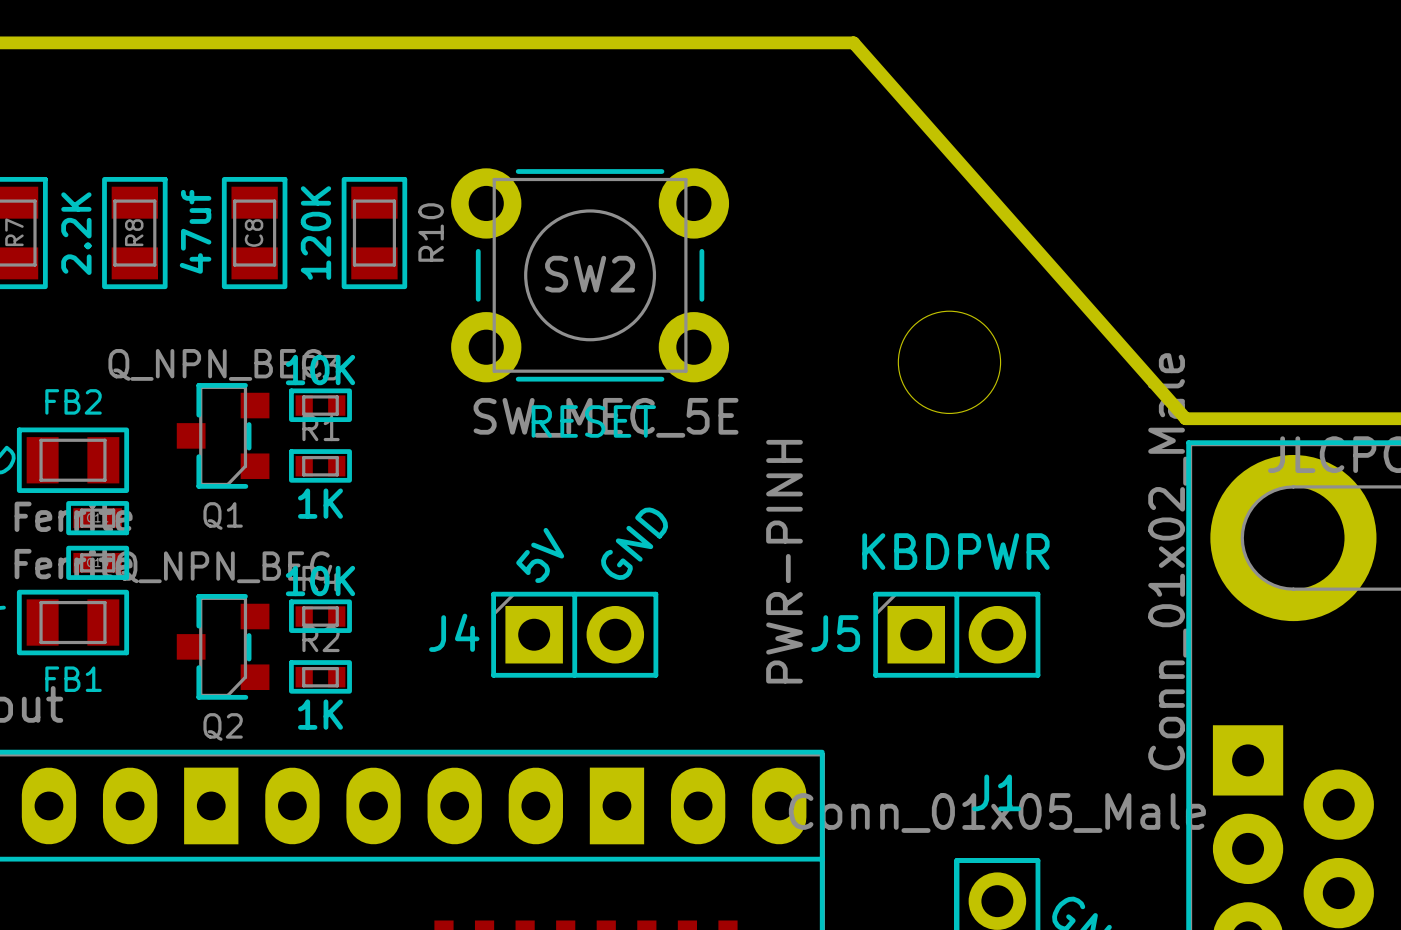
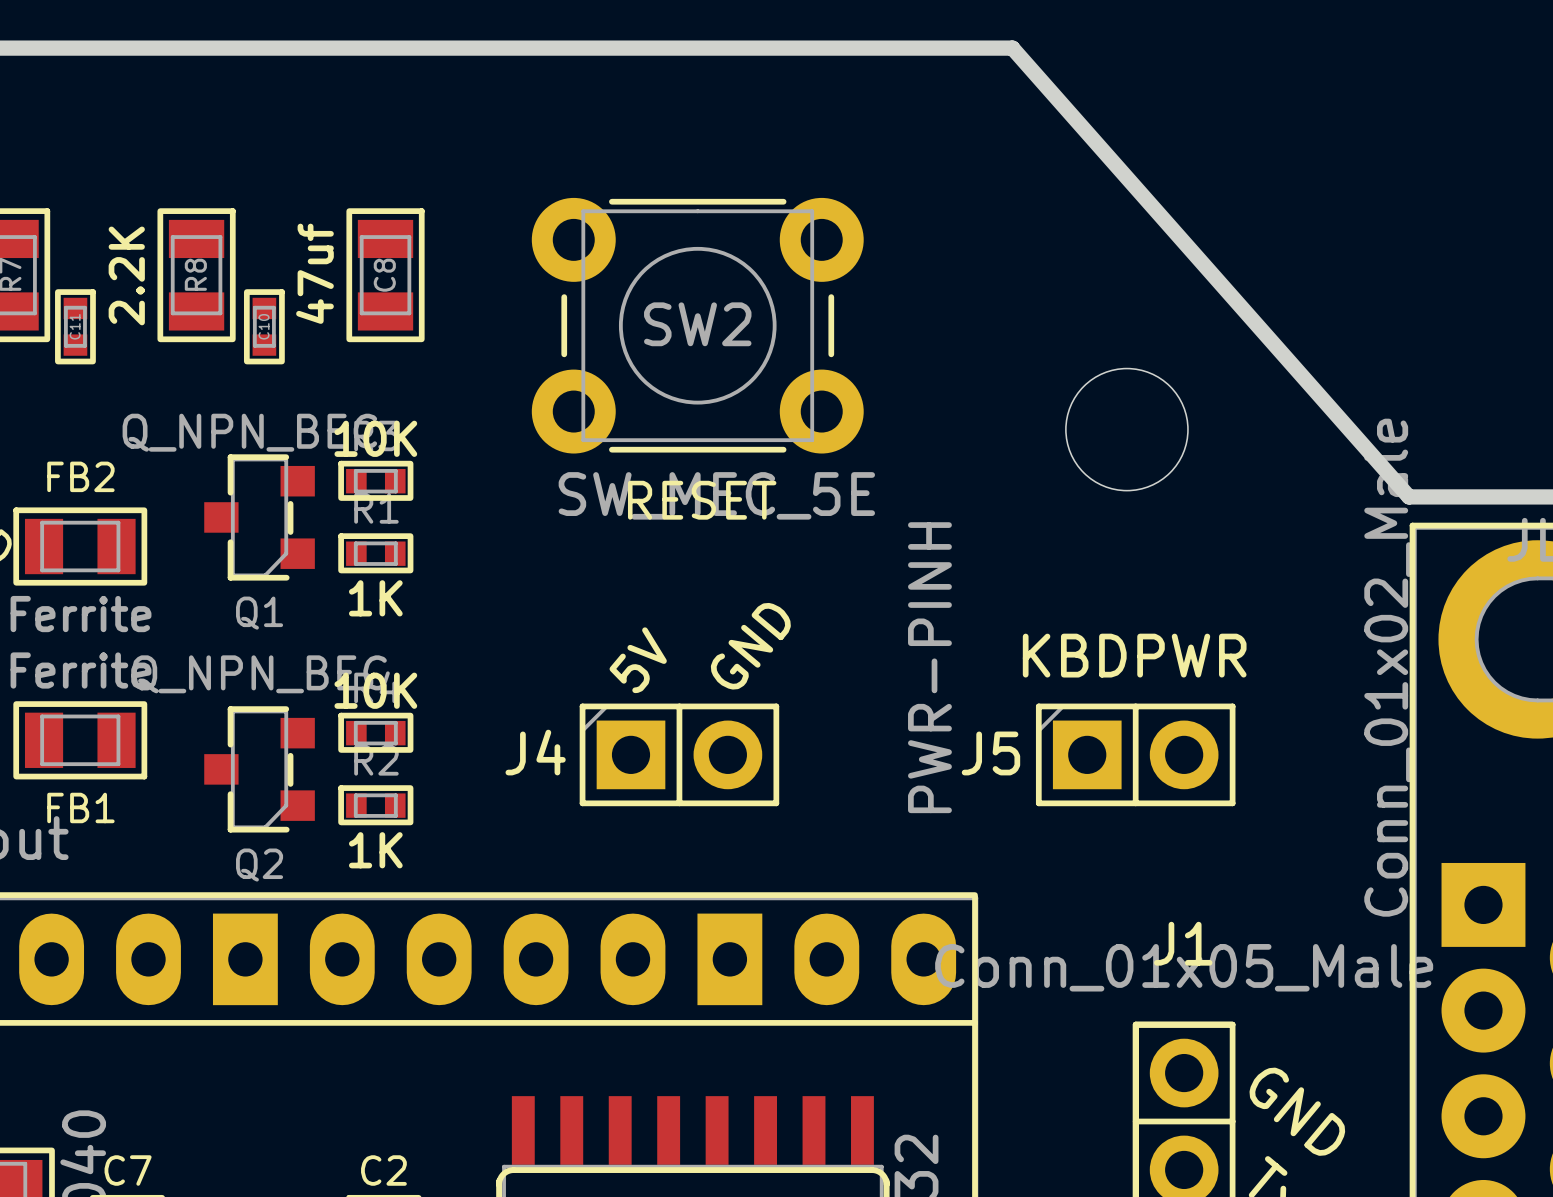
R8 position: (134, 233) -> (196, 275)
C8 position: (254, 233) -> (385, 275)
R10: 120K (374, 233) -> none
C11 rotation: 0° (97, 518) -> 90° clockwise (75, 326)
C11 position: (97, 518) -> (75, 326)
C10 rotation: 0° (97, 562) -> 90° clockwise (264, 326)
C10 position: (97, 562) -> (264, 326)

